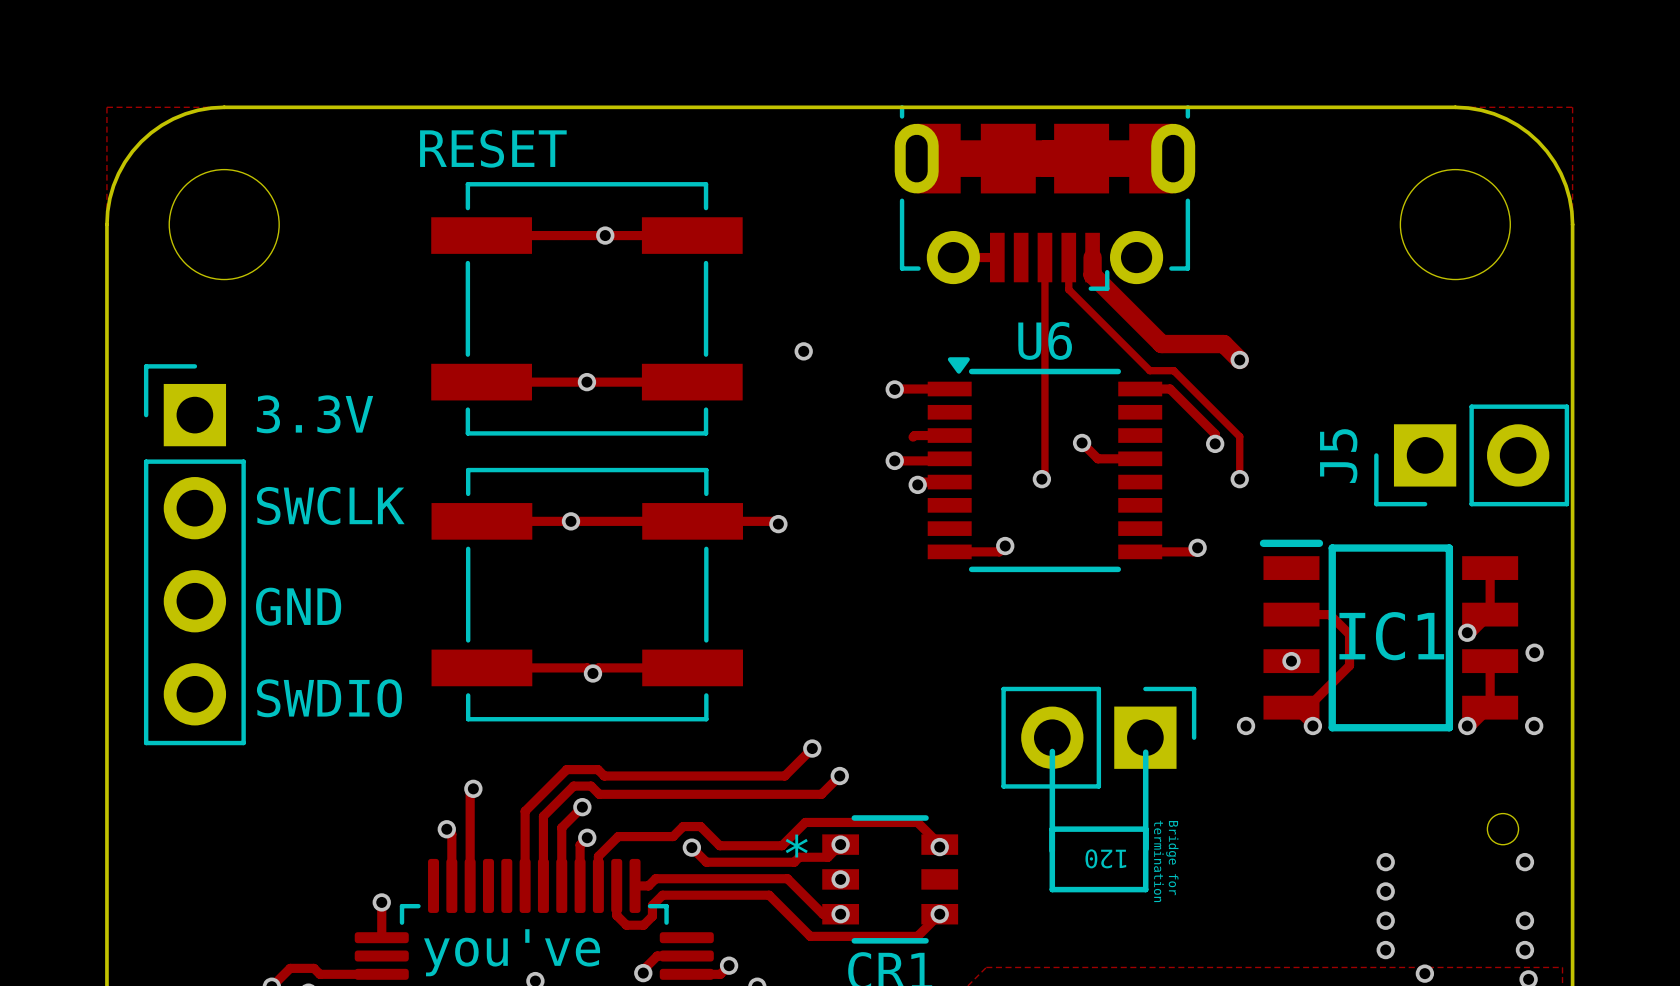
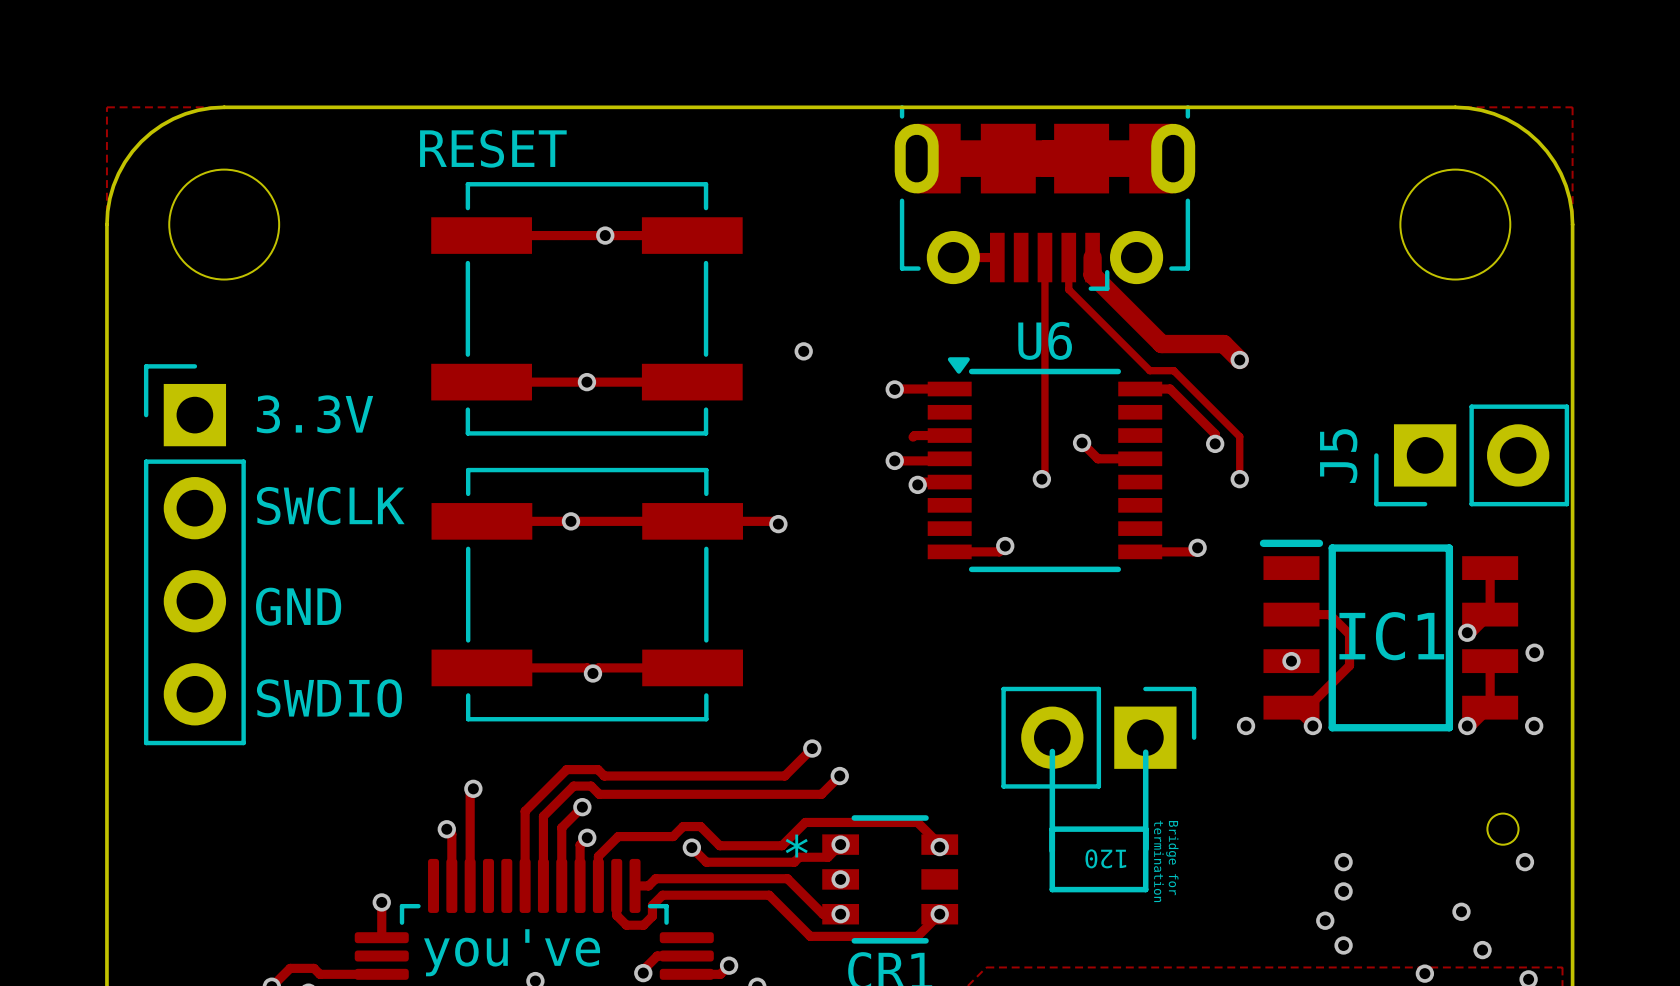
via: none -> (1343, 862)
via: (1385, 862) -> none
via: none -> (1343, 891)
via: (1385, 891) -> none
via: none -> (1461, 911)
via: none -> (1325, 920)
via: (1385, 920) -> none
via: (1524, 920) -> none
via: none -> (1343, 945)
via: (1385, 950) -> none
via: none -> (1482, 950)
via: (1524, 950) -> none

